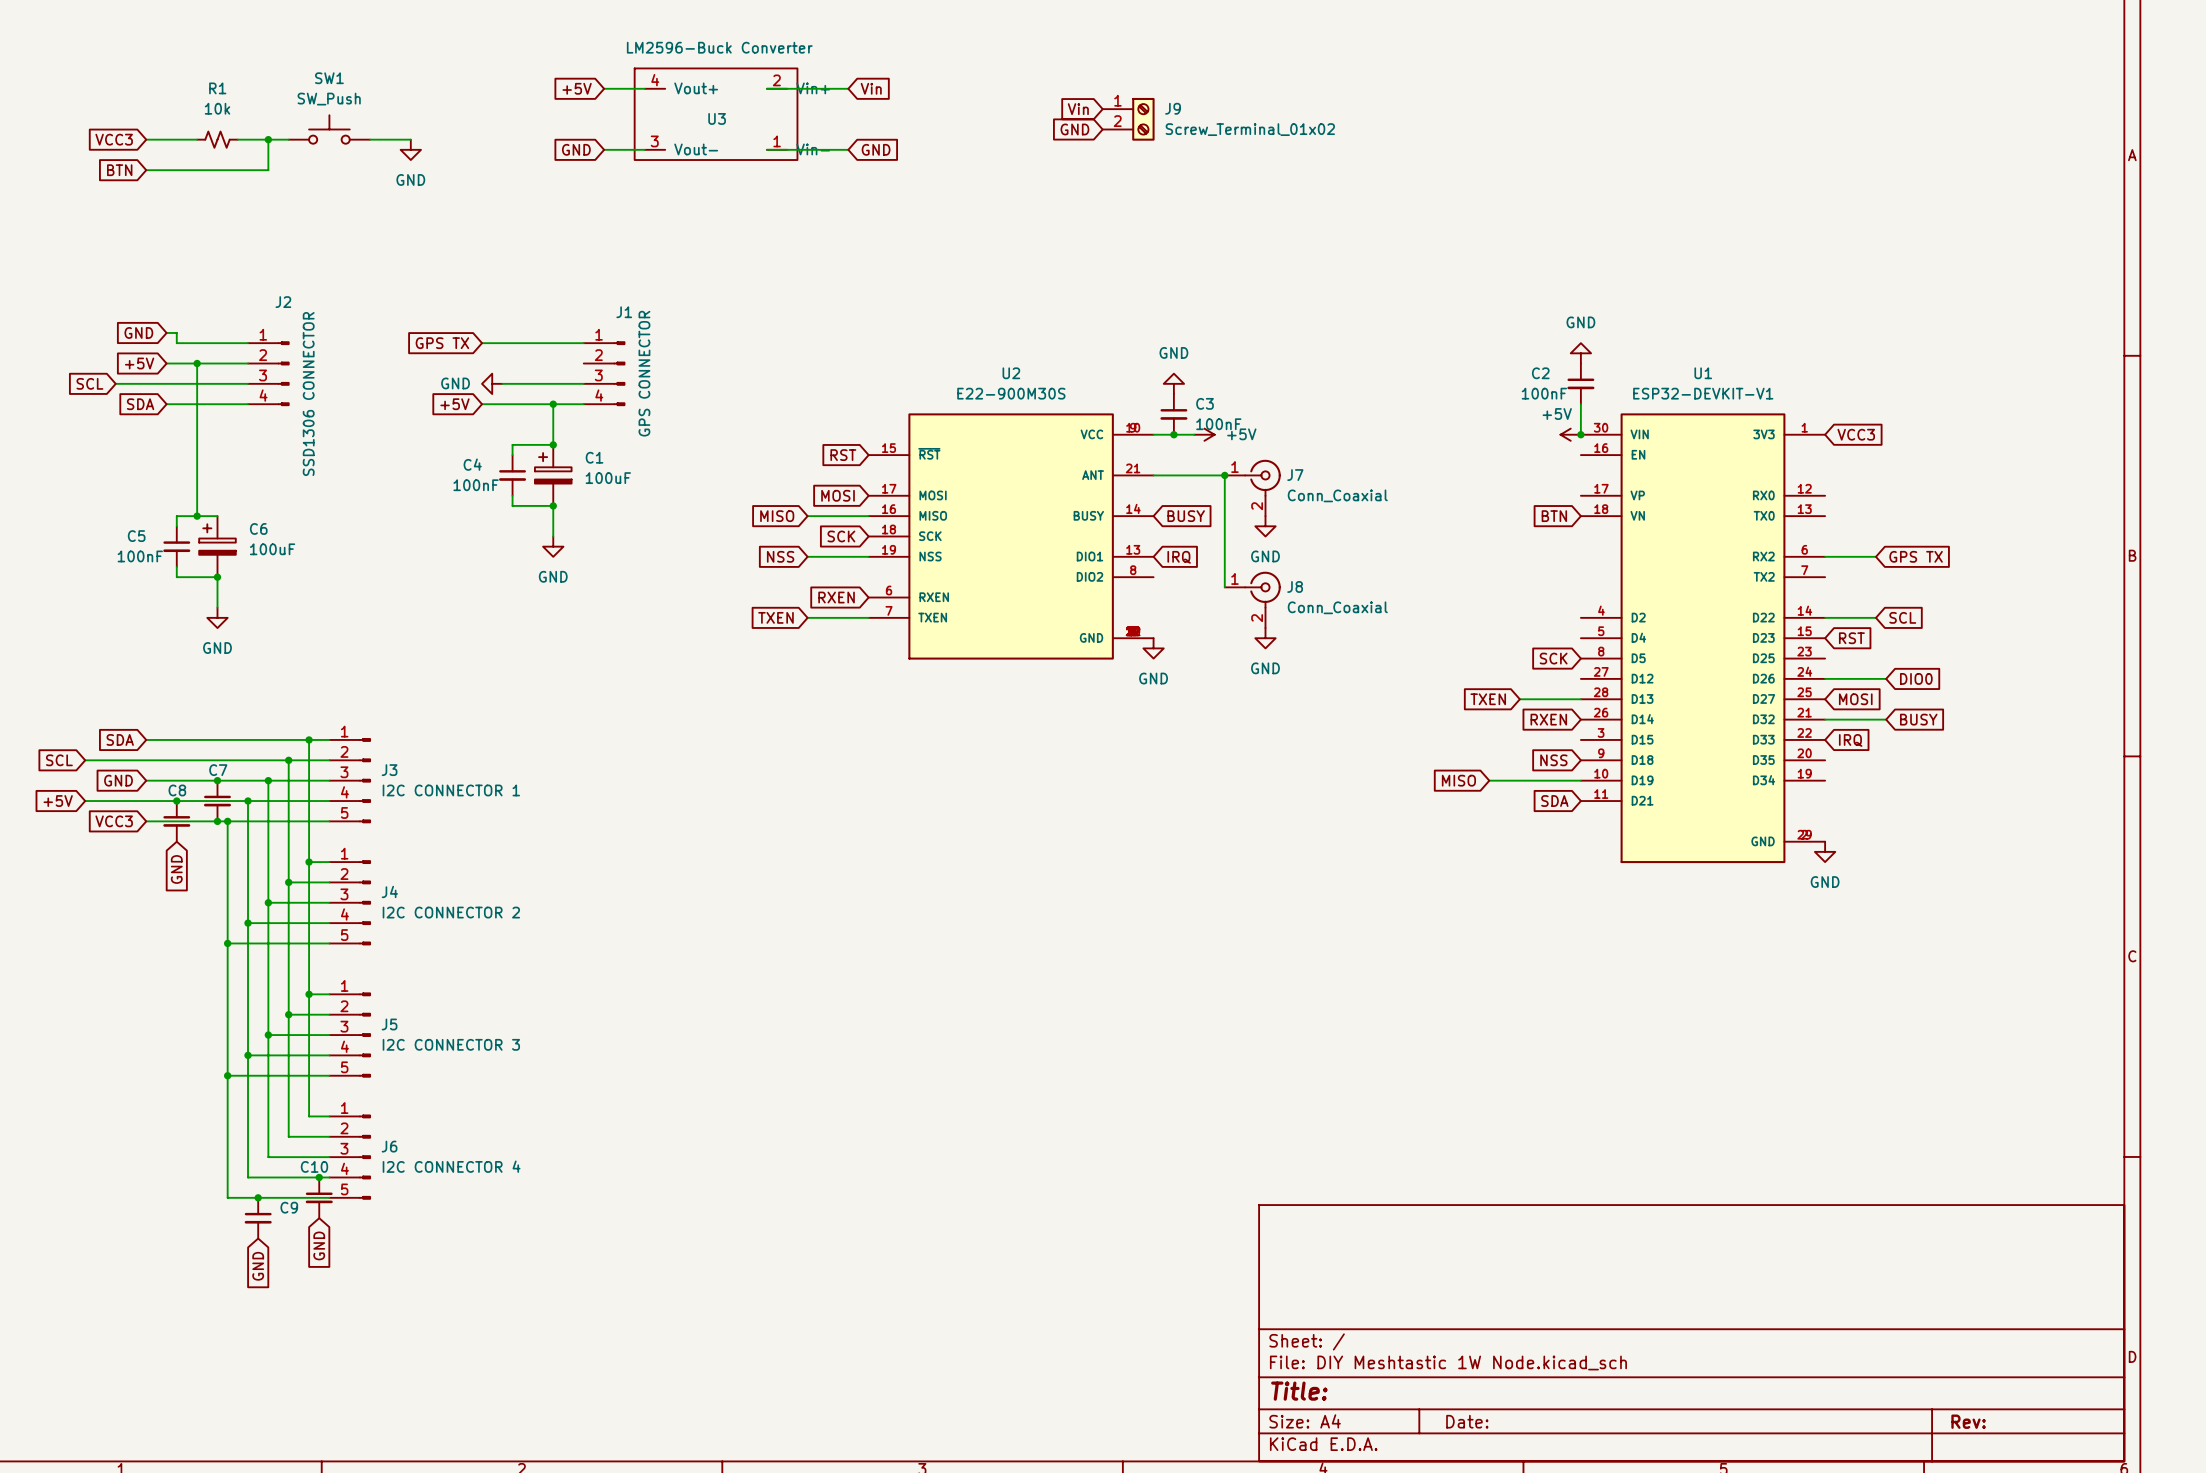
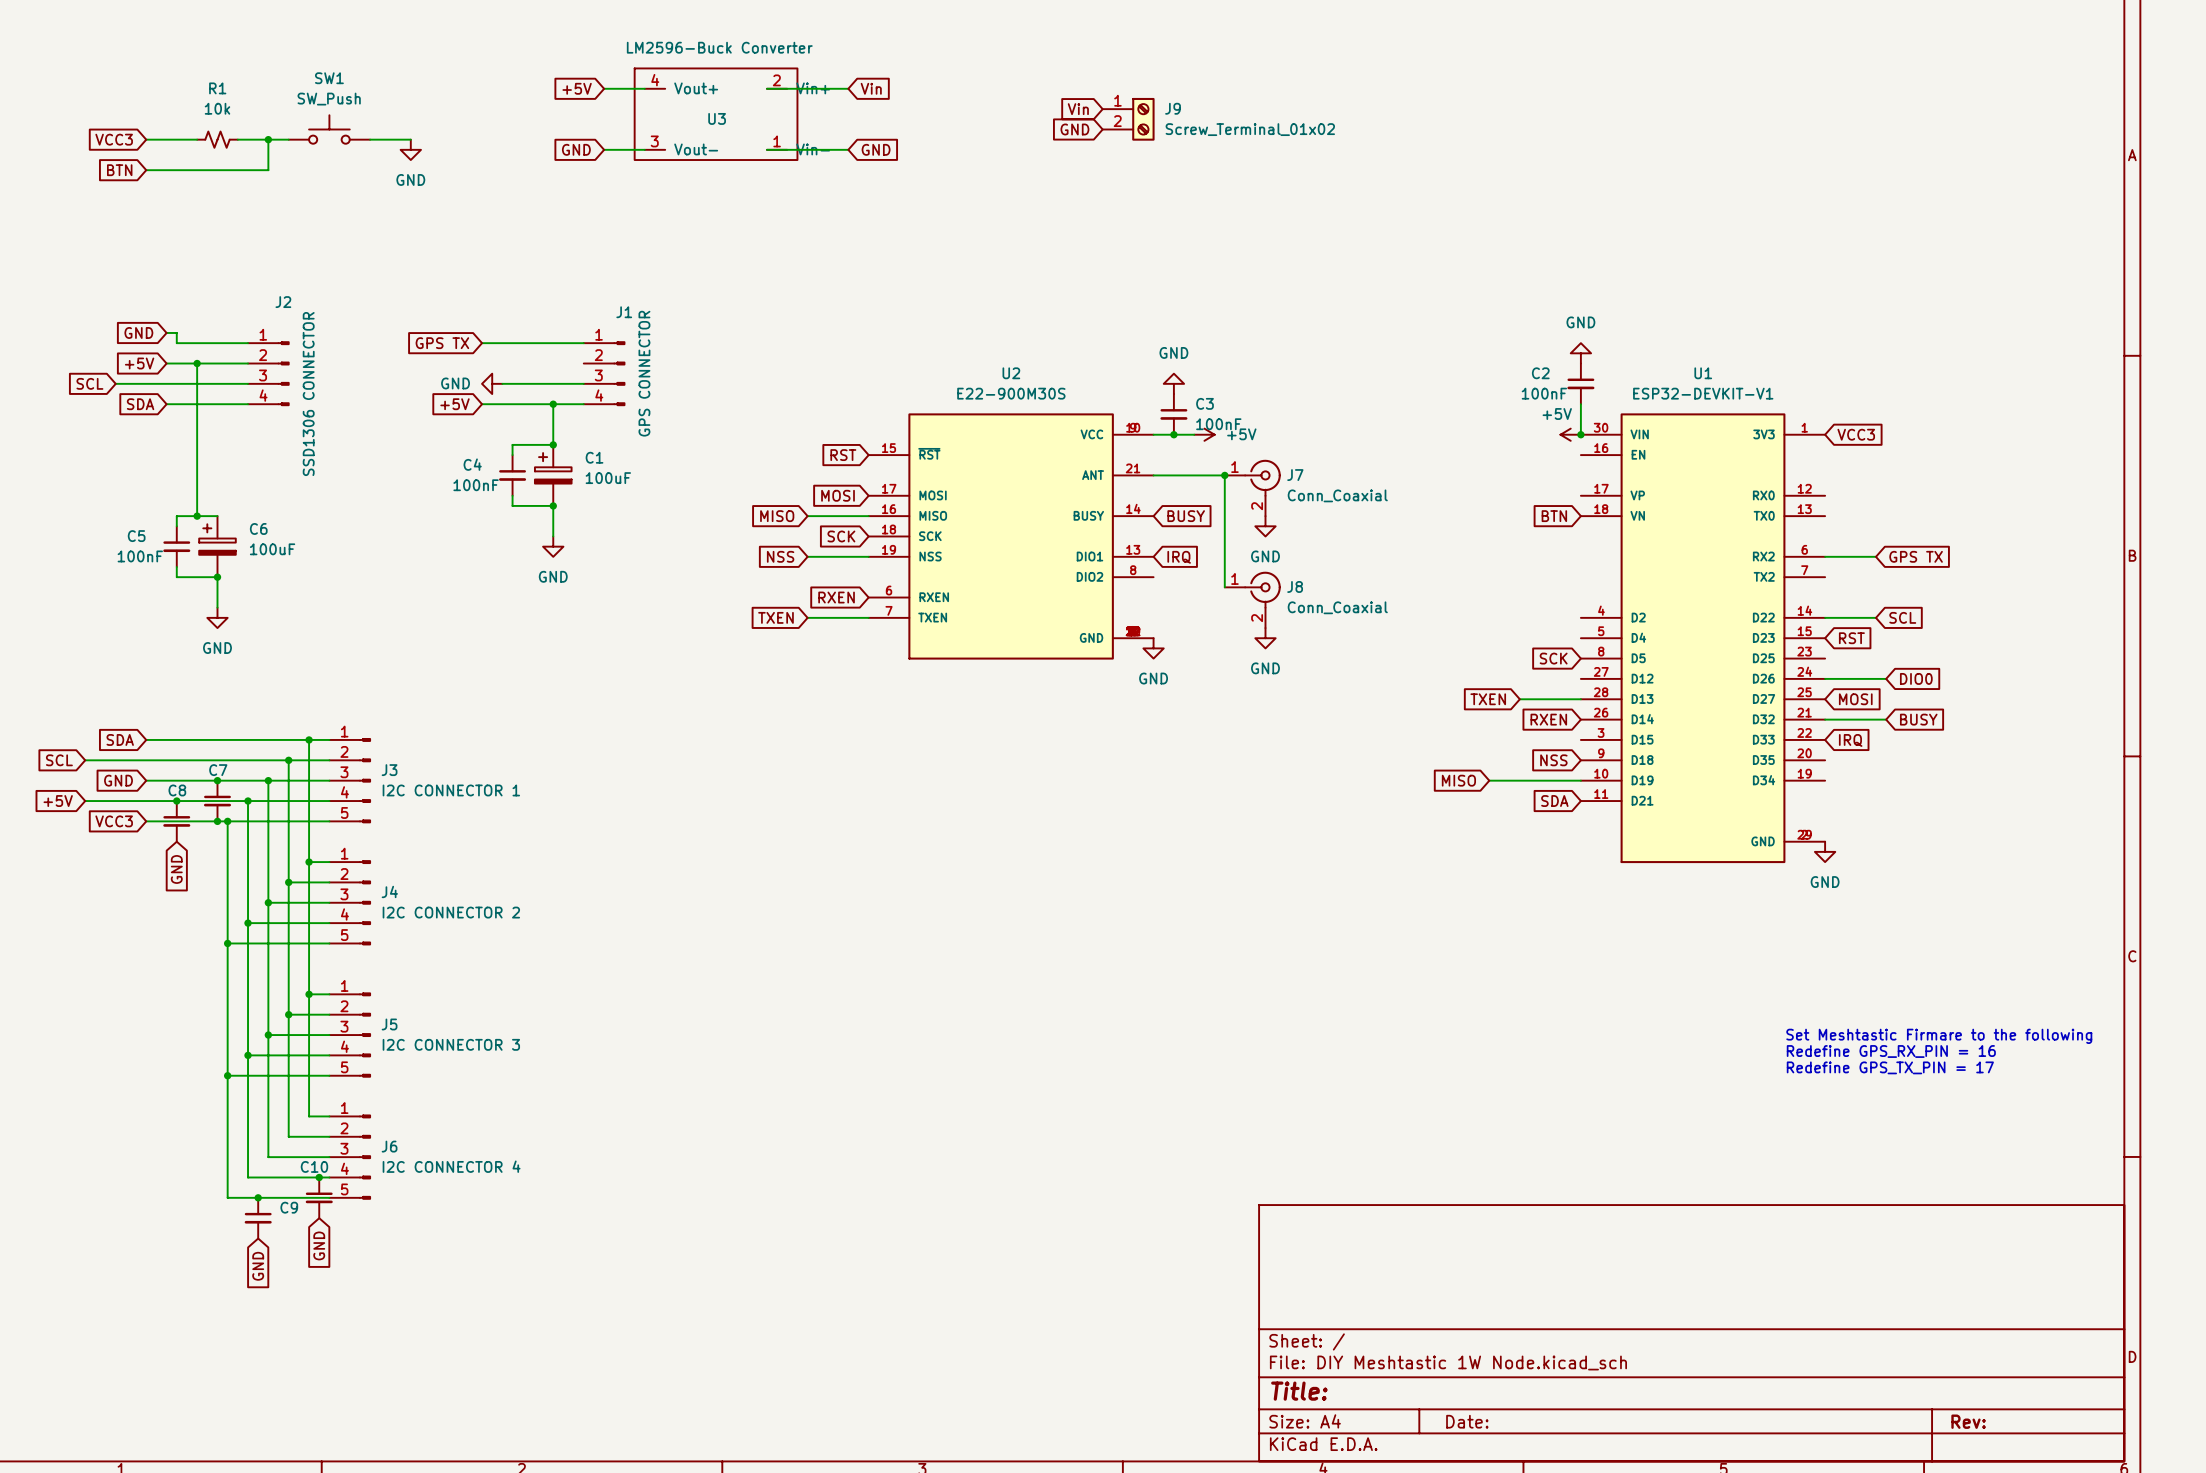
text: none -> Set Meshtastic Firmare to the following (1939, 1036)
text: none -> Redefine GPS_RX_PIN = 16 (1891, 1051)
text: none -> Redefine GPS_TX_PIN = 17 (1890, 1067)

